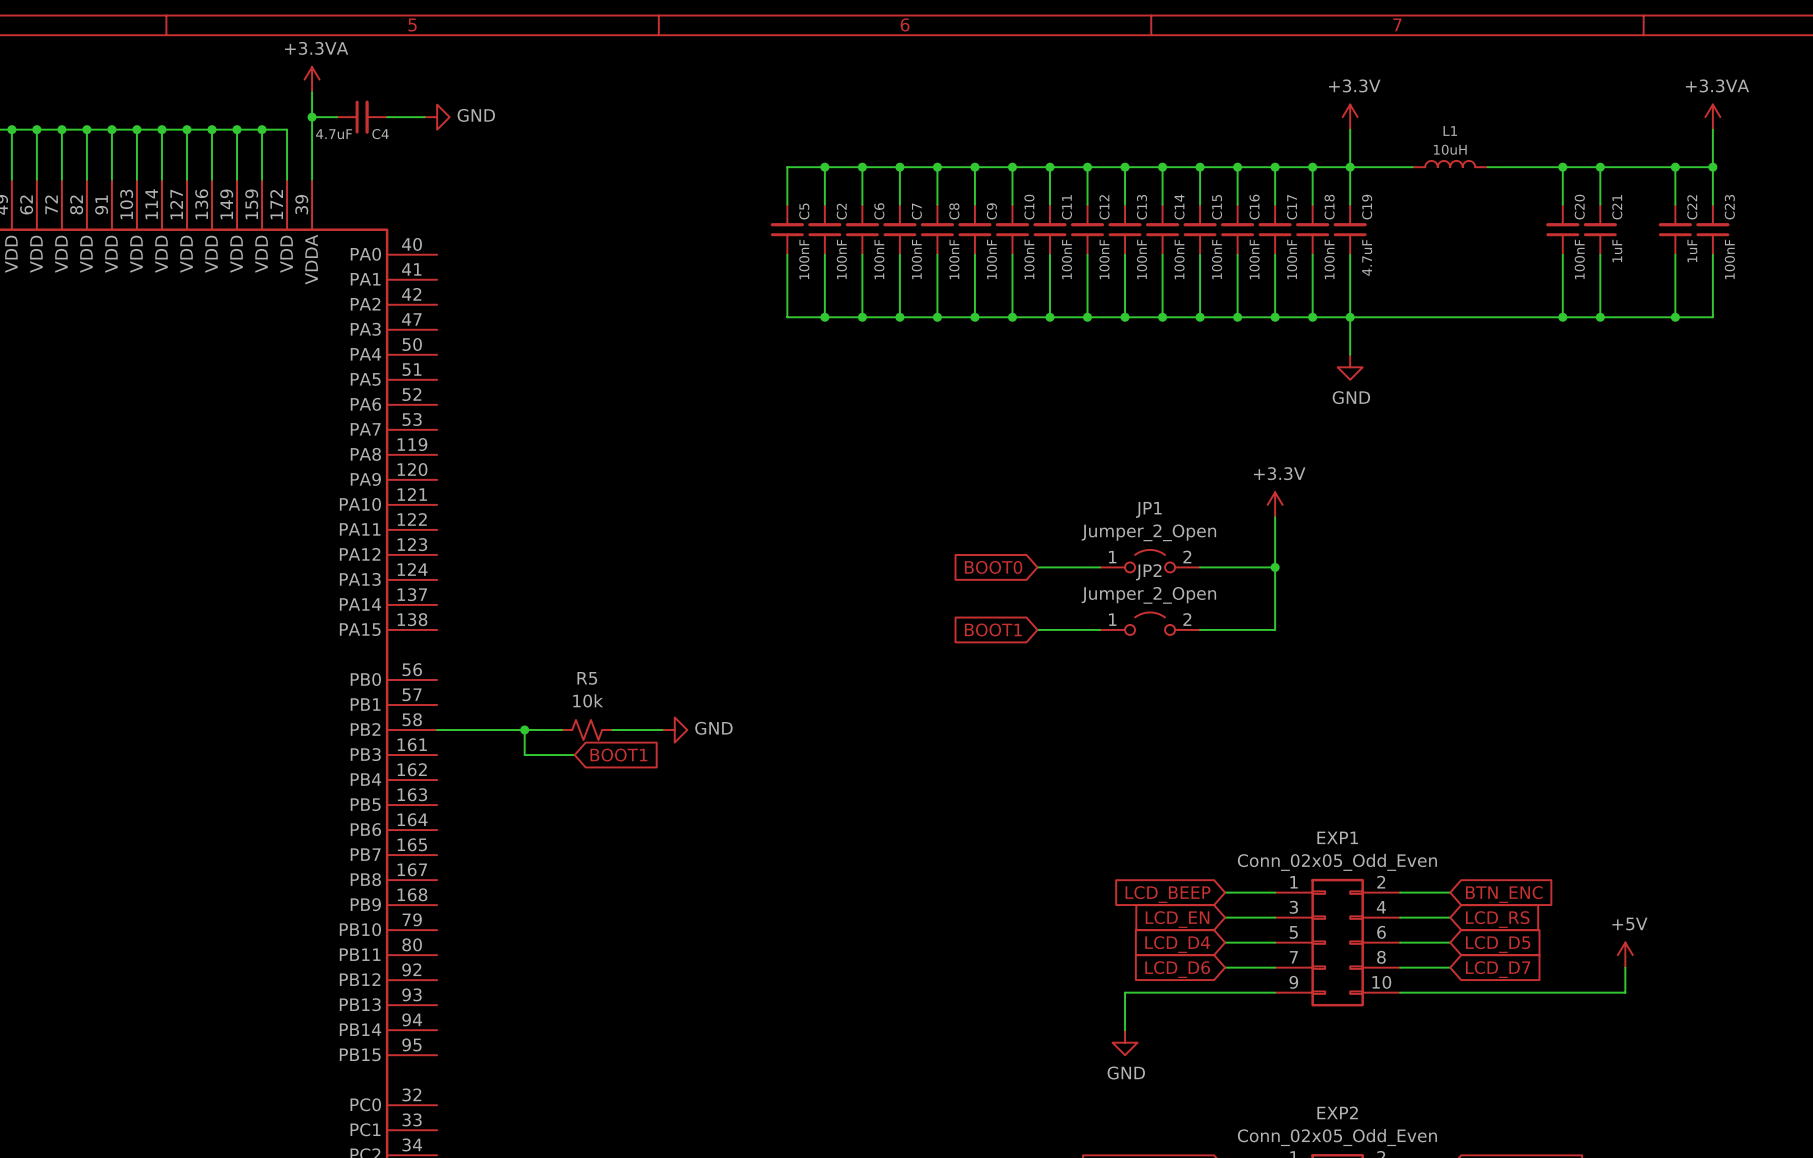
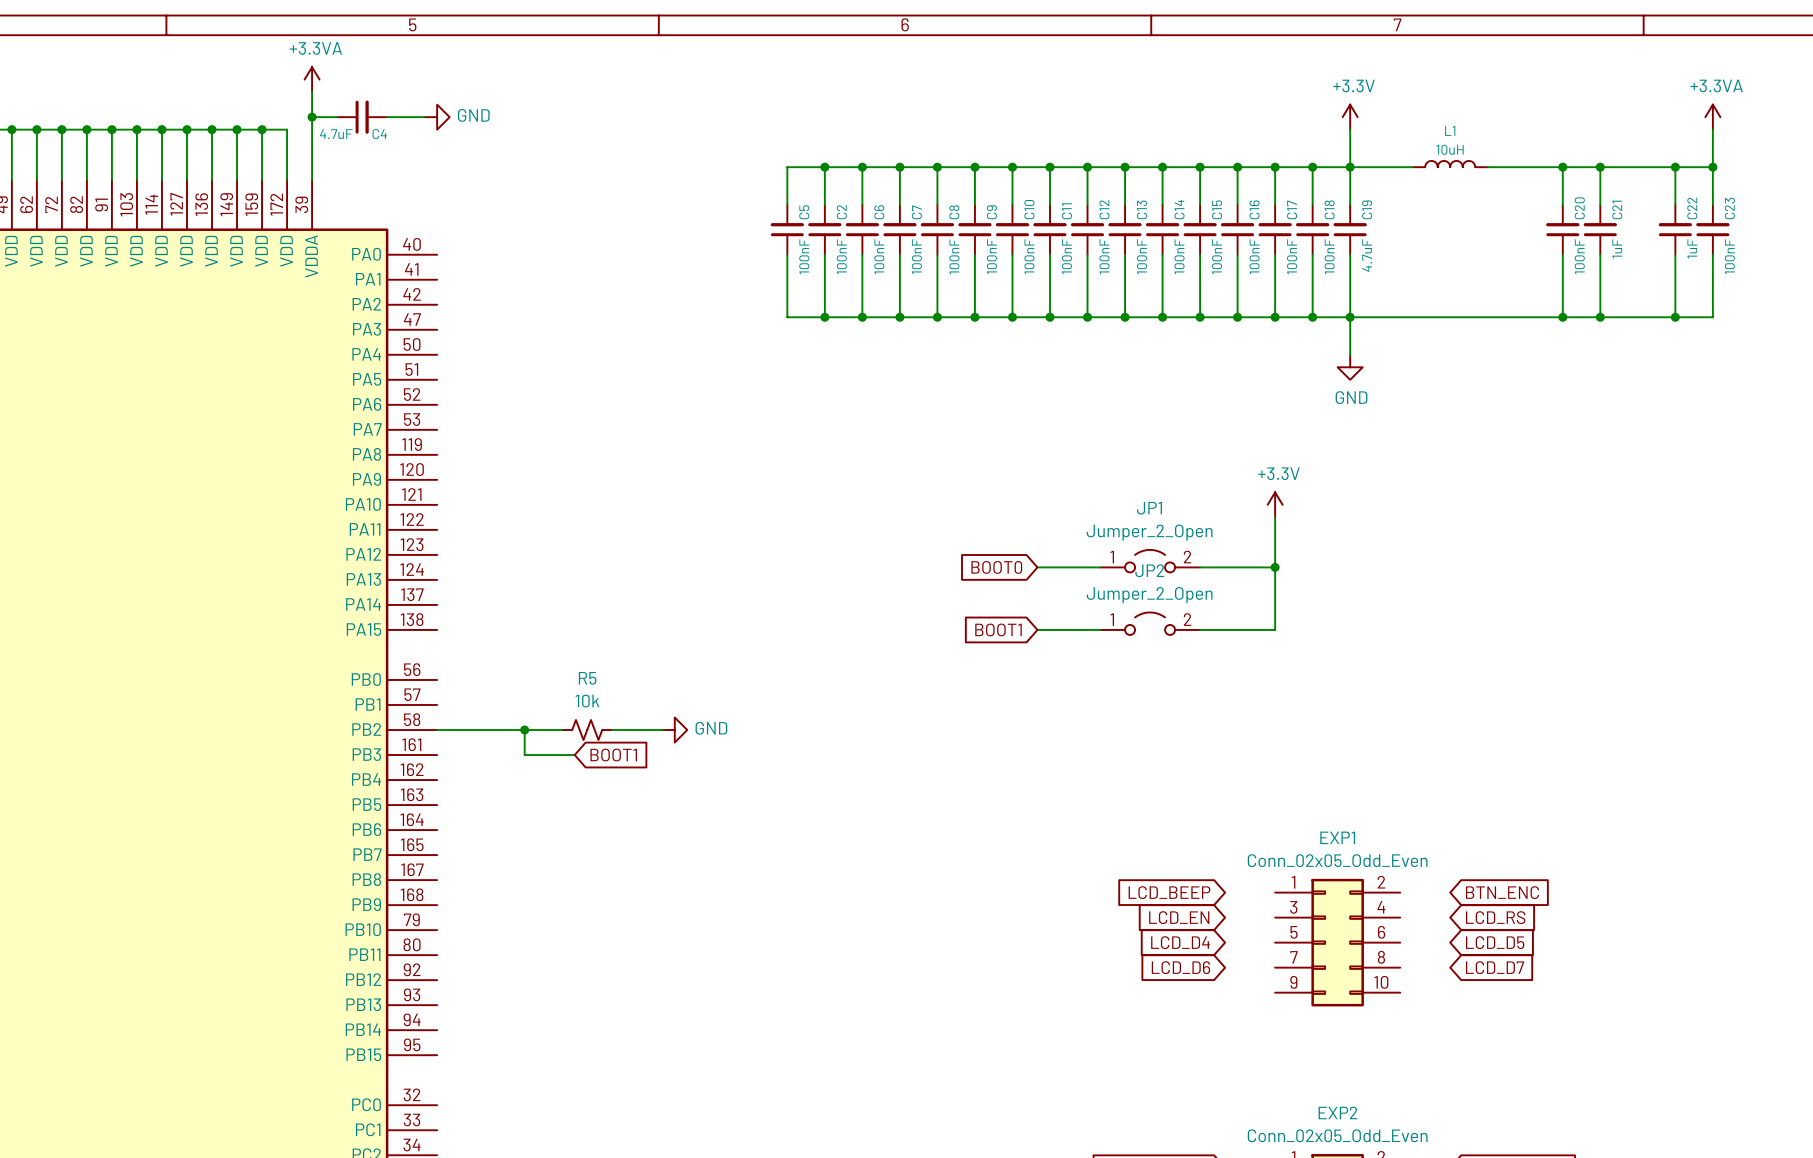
wire: (1225, 892) (1275, 892) -> none
wire: (1400, 892) (1450, 892) -> none
wire: (1225, 917) (1275, 917) -> none
wire: (1400, 917) (1450, 917) -> none
wire: (1225, 942) (1275, 942) -> none
wire: (1400, 942) (1450, 942) -> none
power symbol: +5V (1625, 955) -> none
wire: (1225, 967) (1275, 967) -> none
wire: (1400, 967) (1450, 967) -> none
wire: (1625, 967) (1625, 992) (1400, 992) -> none
wire: (1275, 992) (1125, 992) (1125, 1030) -> none
power symbol: GND (1125, 1042) -> none

